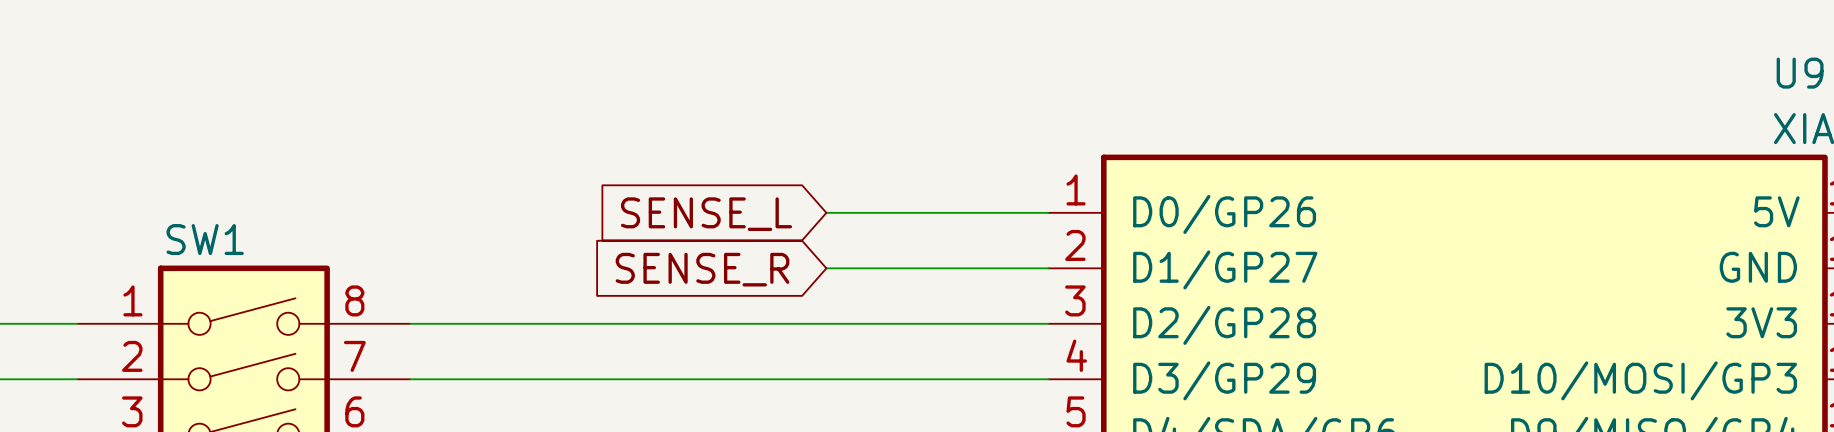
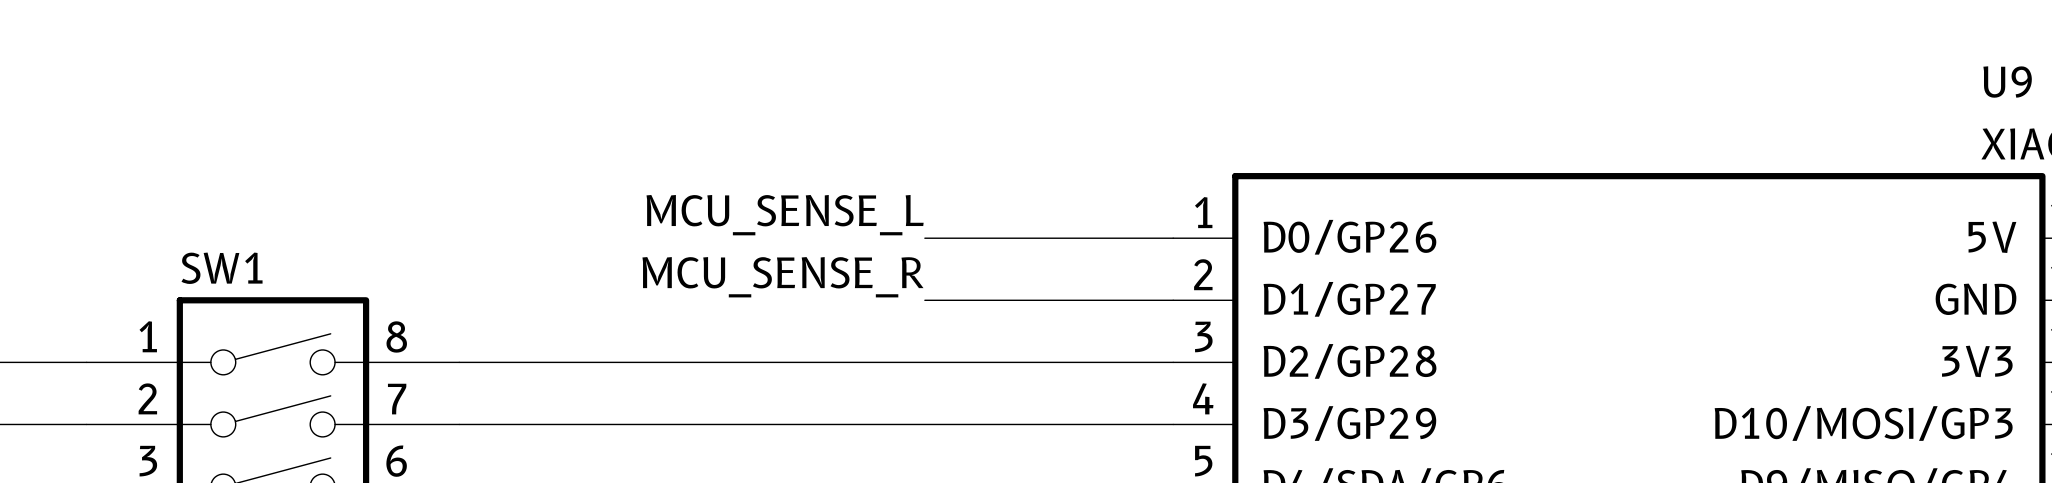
label: none -> MCU_SENSE_L (785, 215)
global label: SENSE_L (706, 214) -> none
label: none -> MCU_SENSE_R (782, 277)
global label: SENSE_R (702, 269) -> none

